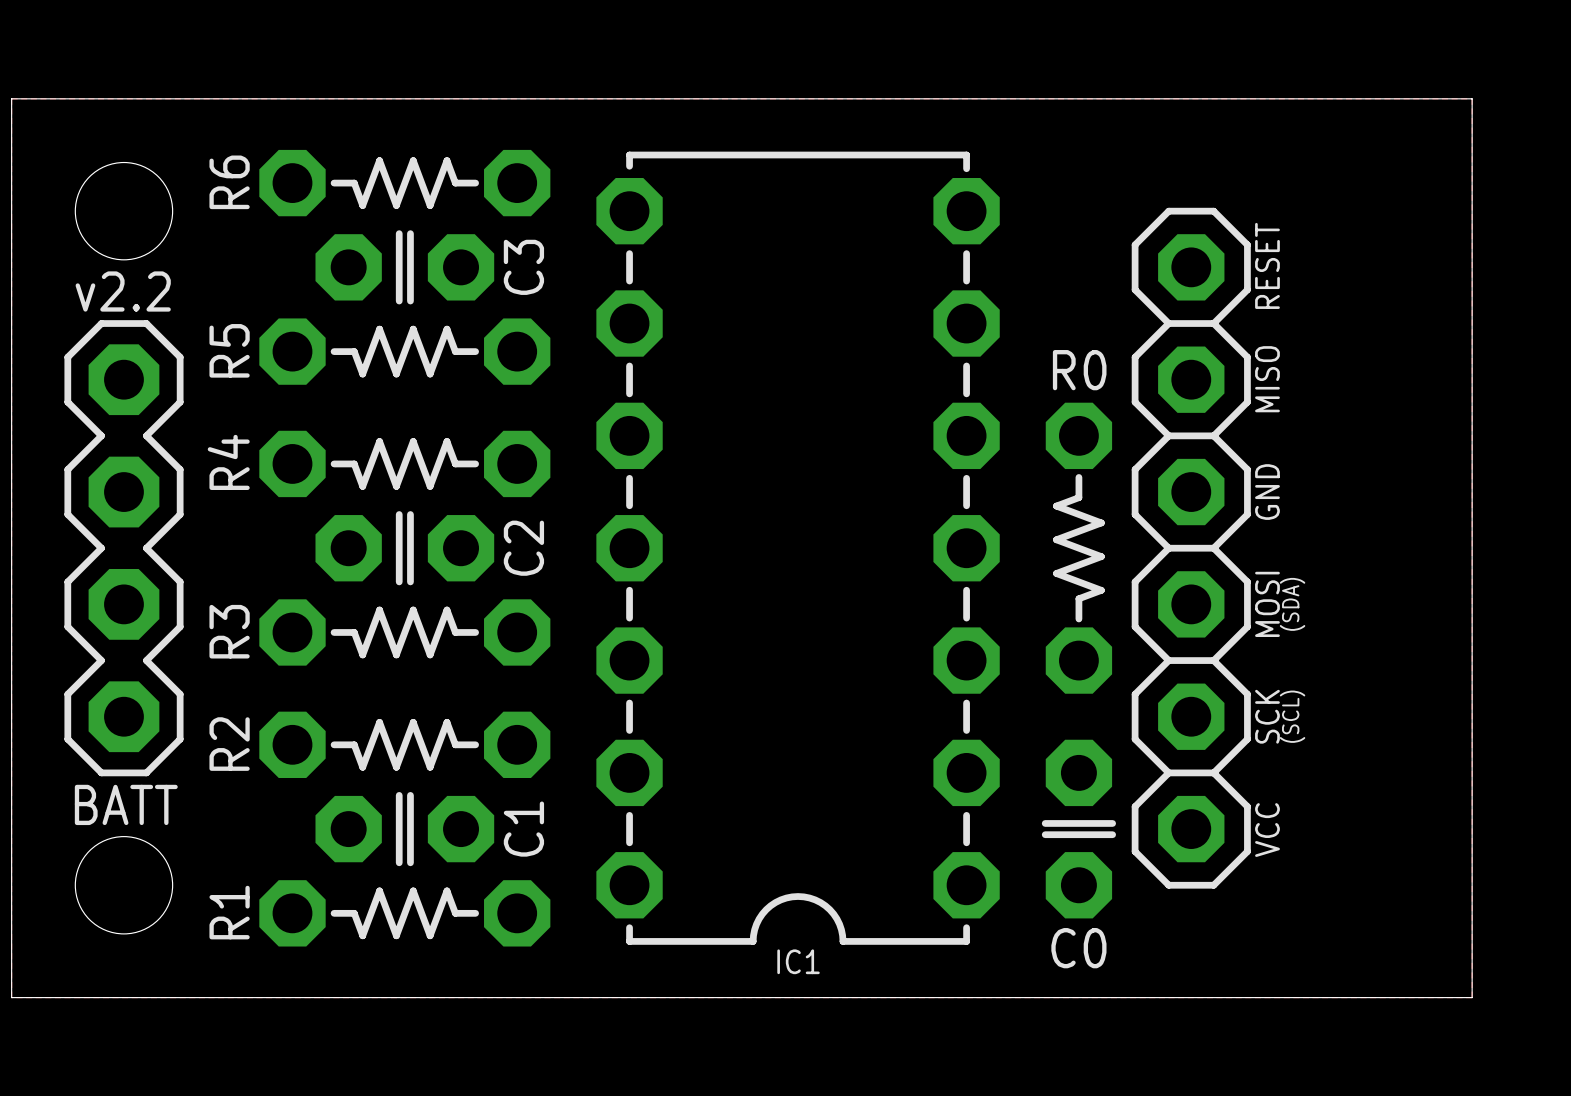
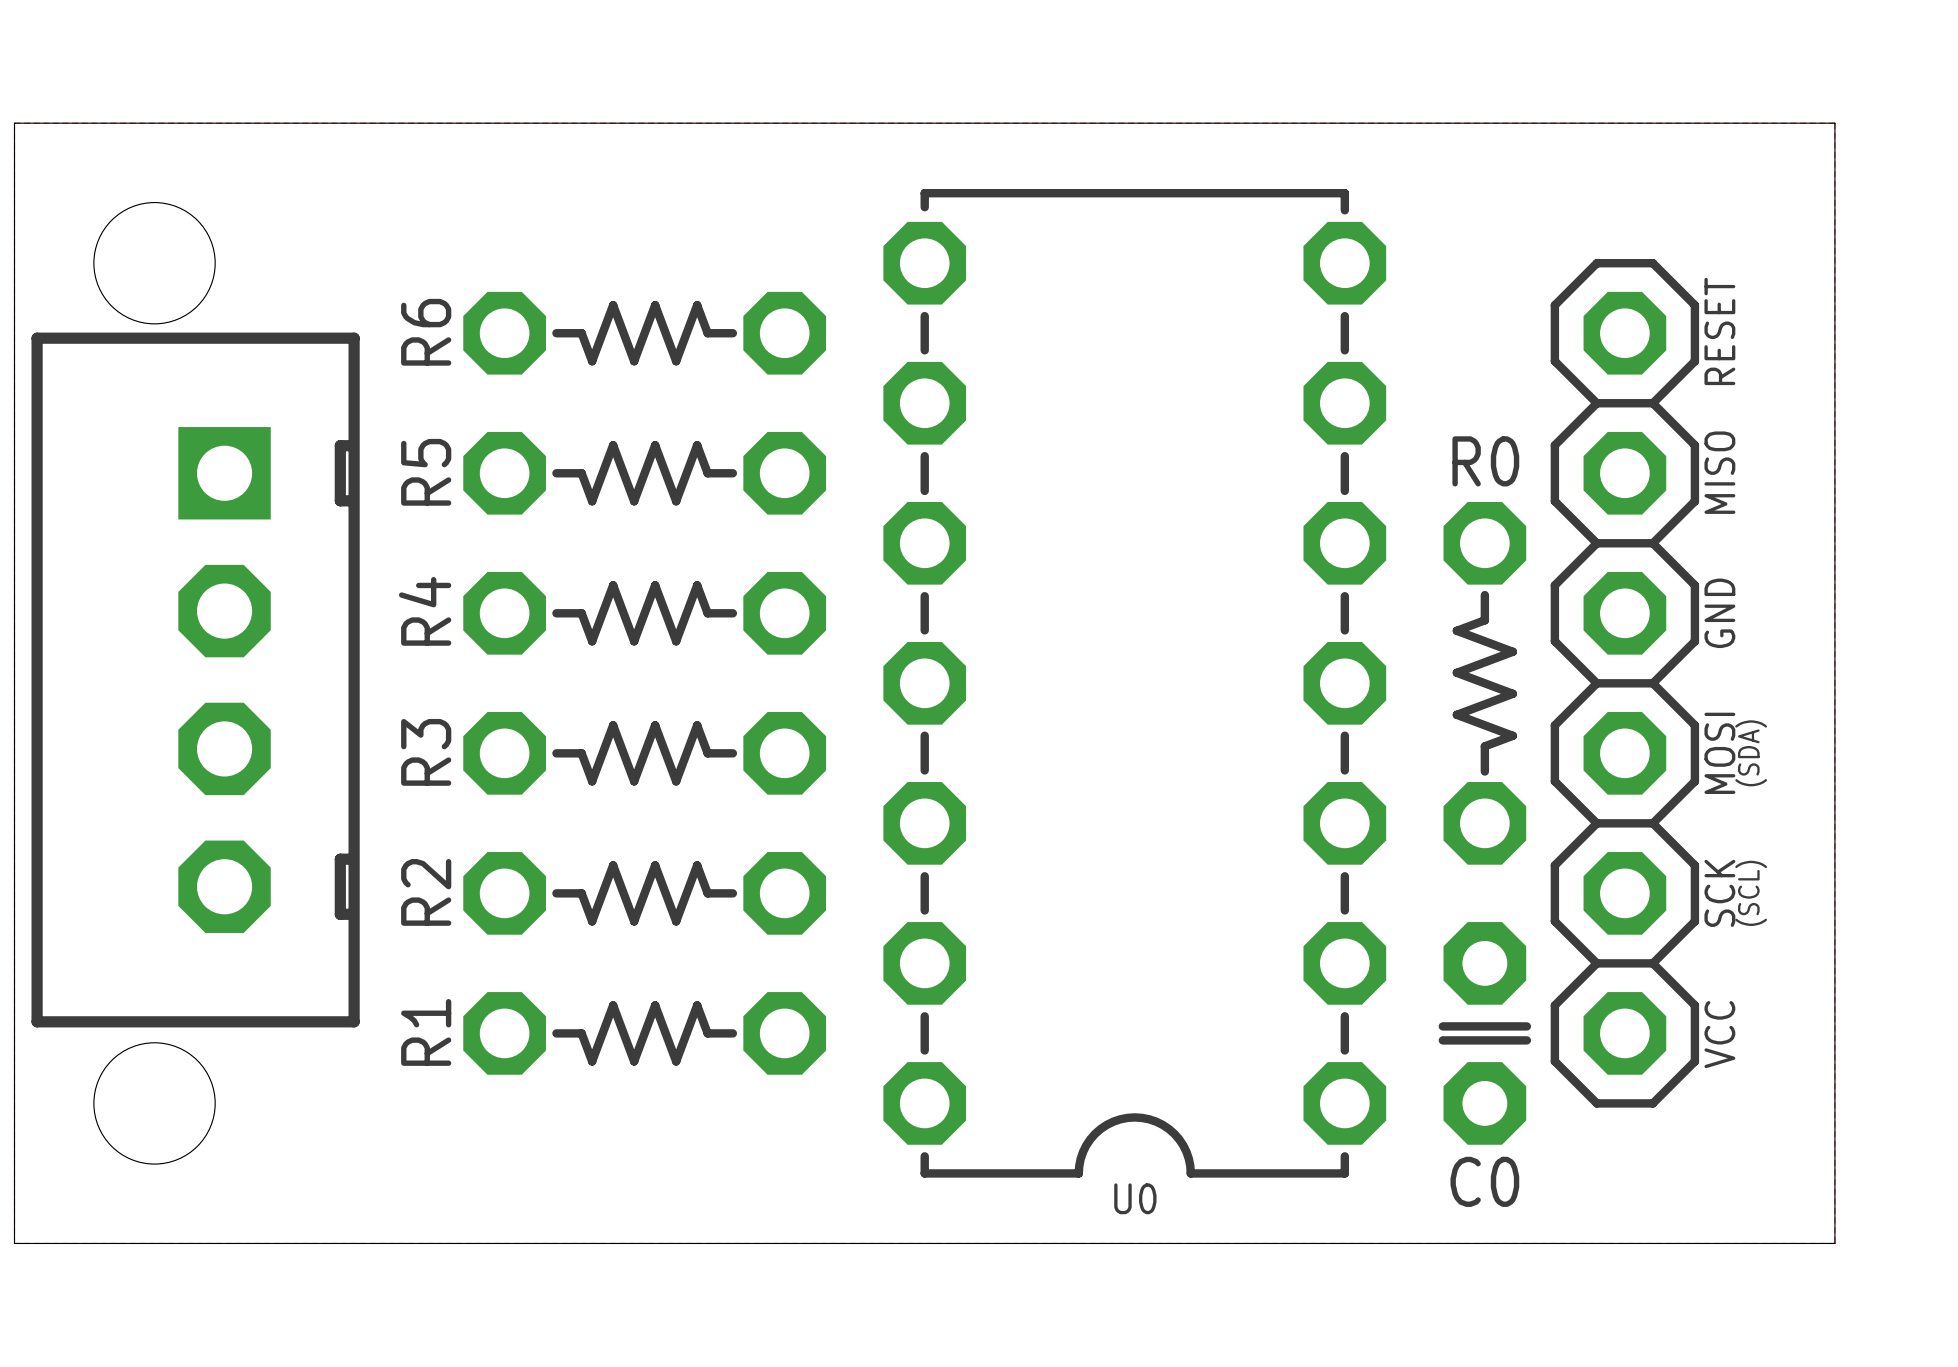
R6 position: (404, 183) -> (644, 333)
C3: (404, 267) -> none
text: v2.2 (123, 291) -> none
R5 position: (404, 351) -> (644, 473)
R4 position: (404, 463) -> (644, 613)
part: none -> (195, 680)
BATT: (123, 548) -> none
C2: (404, 548) -> none
IC1: (798, 548) -> none
U0: none -> (1134, 683)
R0 position: (1078, 548) -> (1484, 683)
part position: (1191, 548) -> (1624, 683)
R3 position: (404, 632) -> (644, 753)
R2 position: (404, 744) -> (644, 893)
C1: (404, 829) -> none
C0 position: (1078, 829) -> (1484, 1033)
R1 position: (404, 913) -> (644, 1033)

